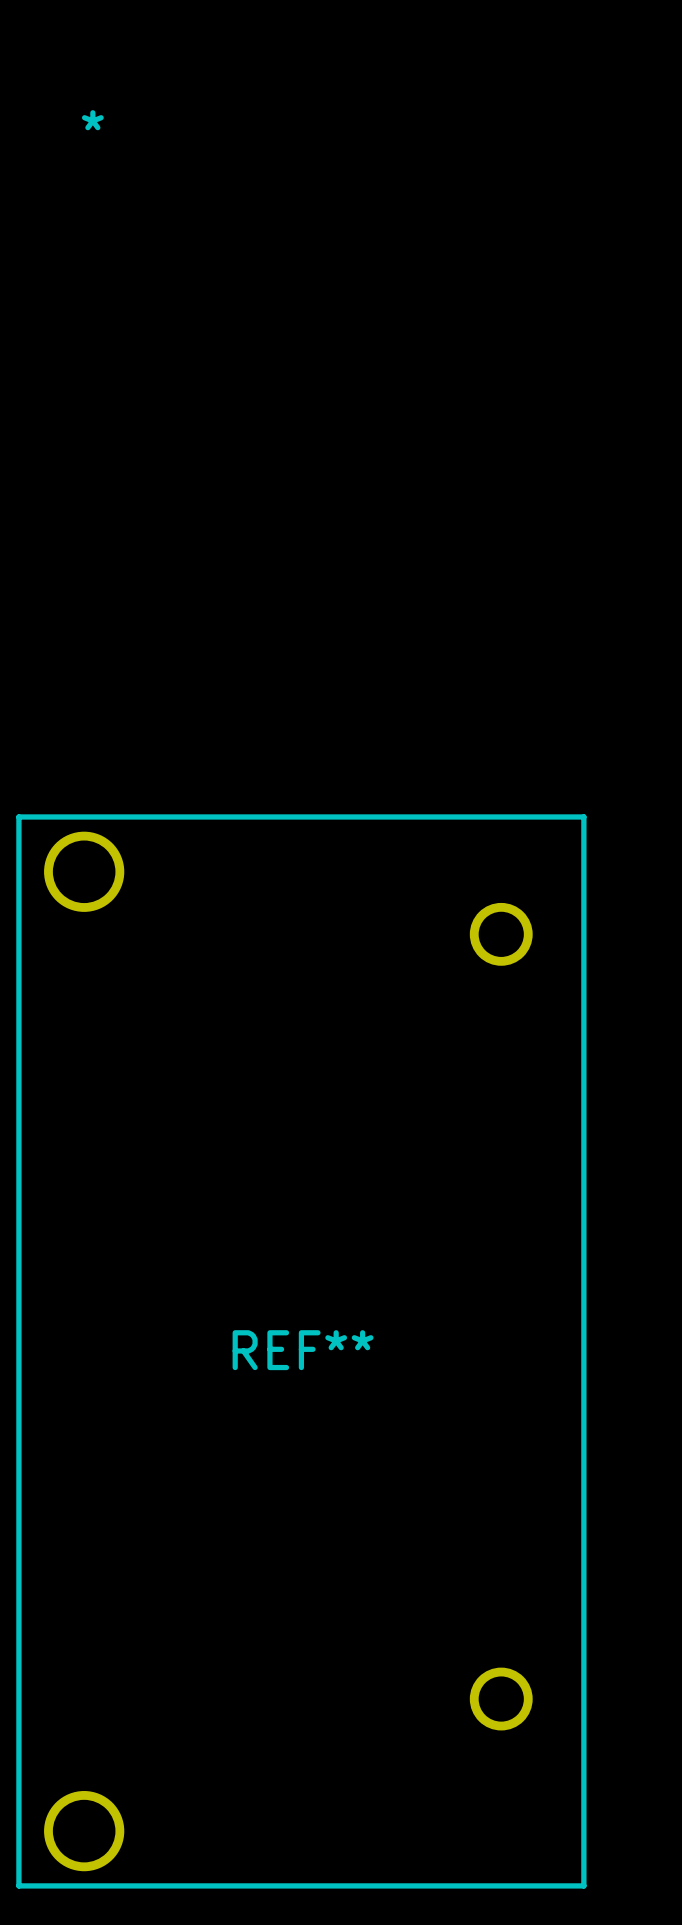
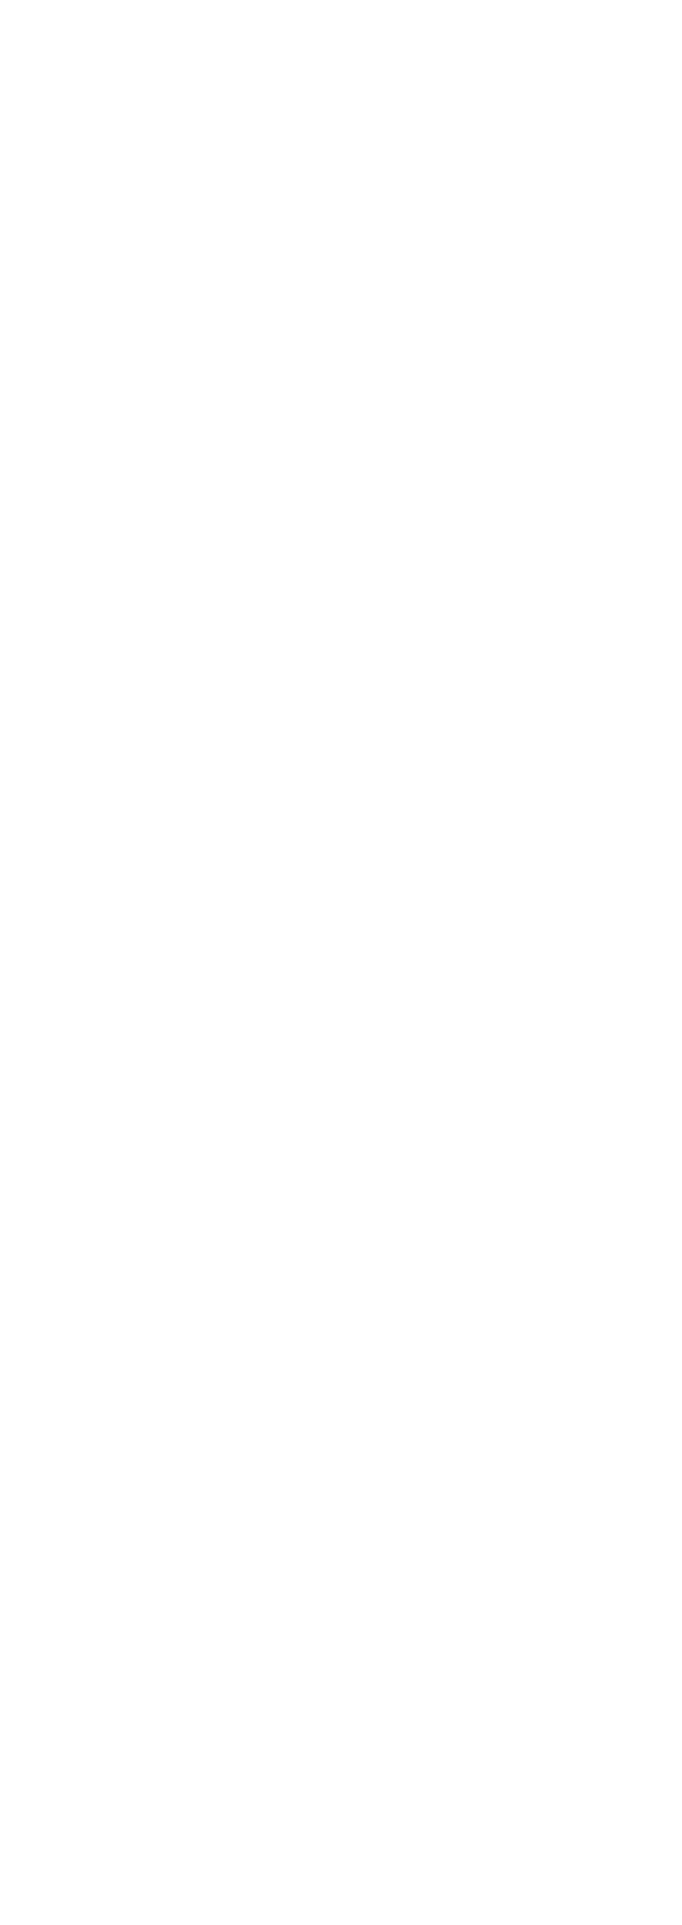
REF**: (301, 1351) -> none

